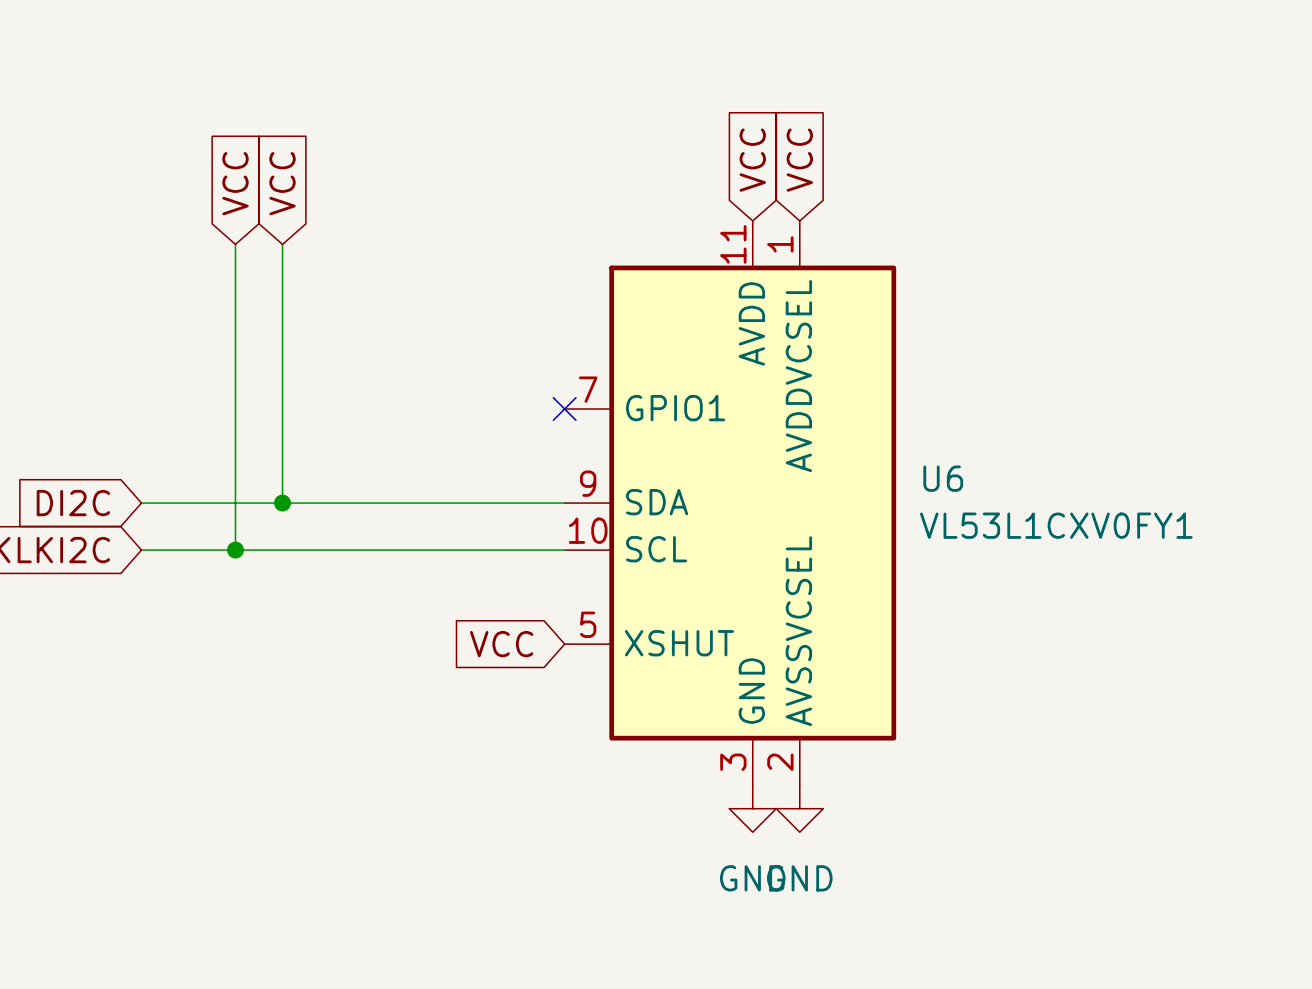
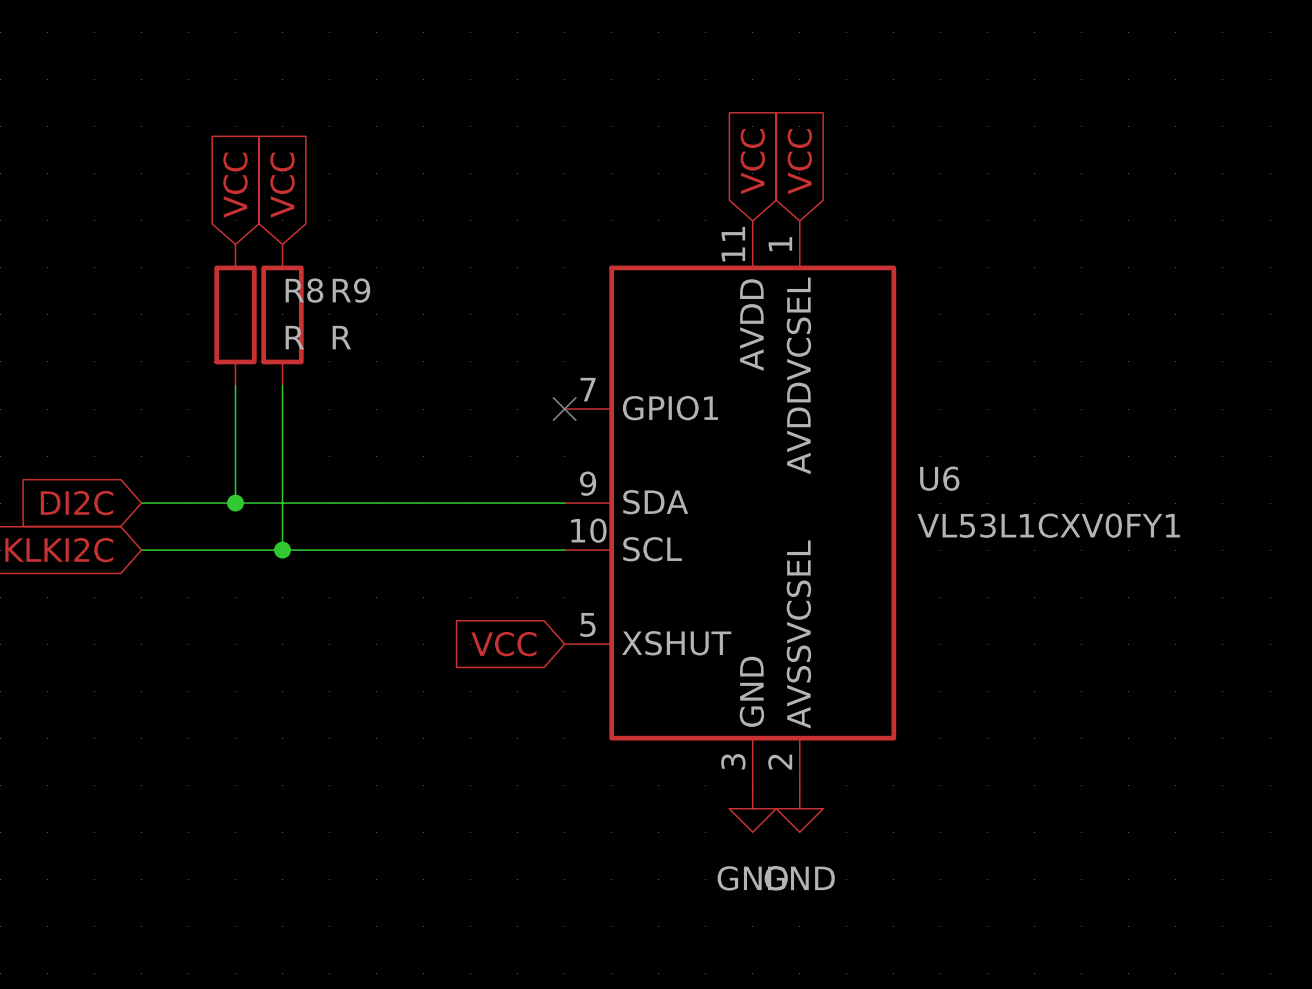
wire: (235, 244) (235, 385) -> none
wire: (282, 244) (282, 385) -> none
R8: none -> R (235, 314)
R9: none -> R (282, 314)
wire: (235, 503) (235, 550) -> (282, 503) (282, 550)
junction: none -> (235, 503)
junction: (282, 503) -> none
junction: (235, 550) -> none
junction: none -> (282, 550)

